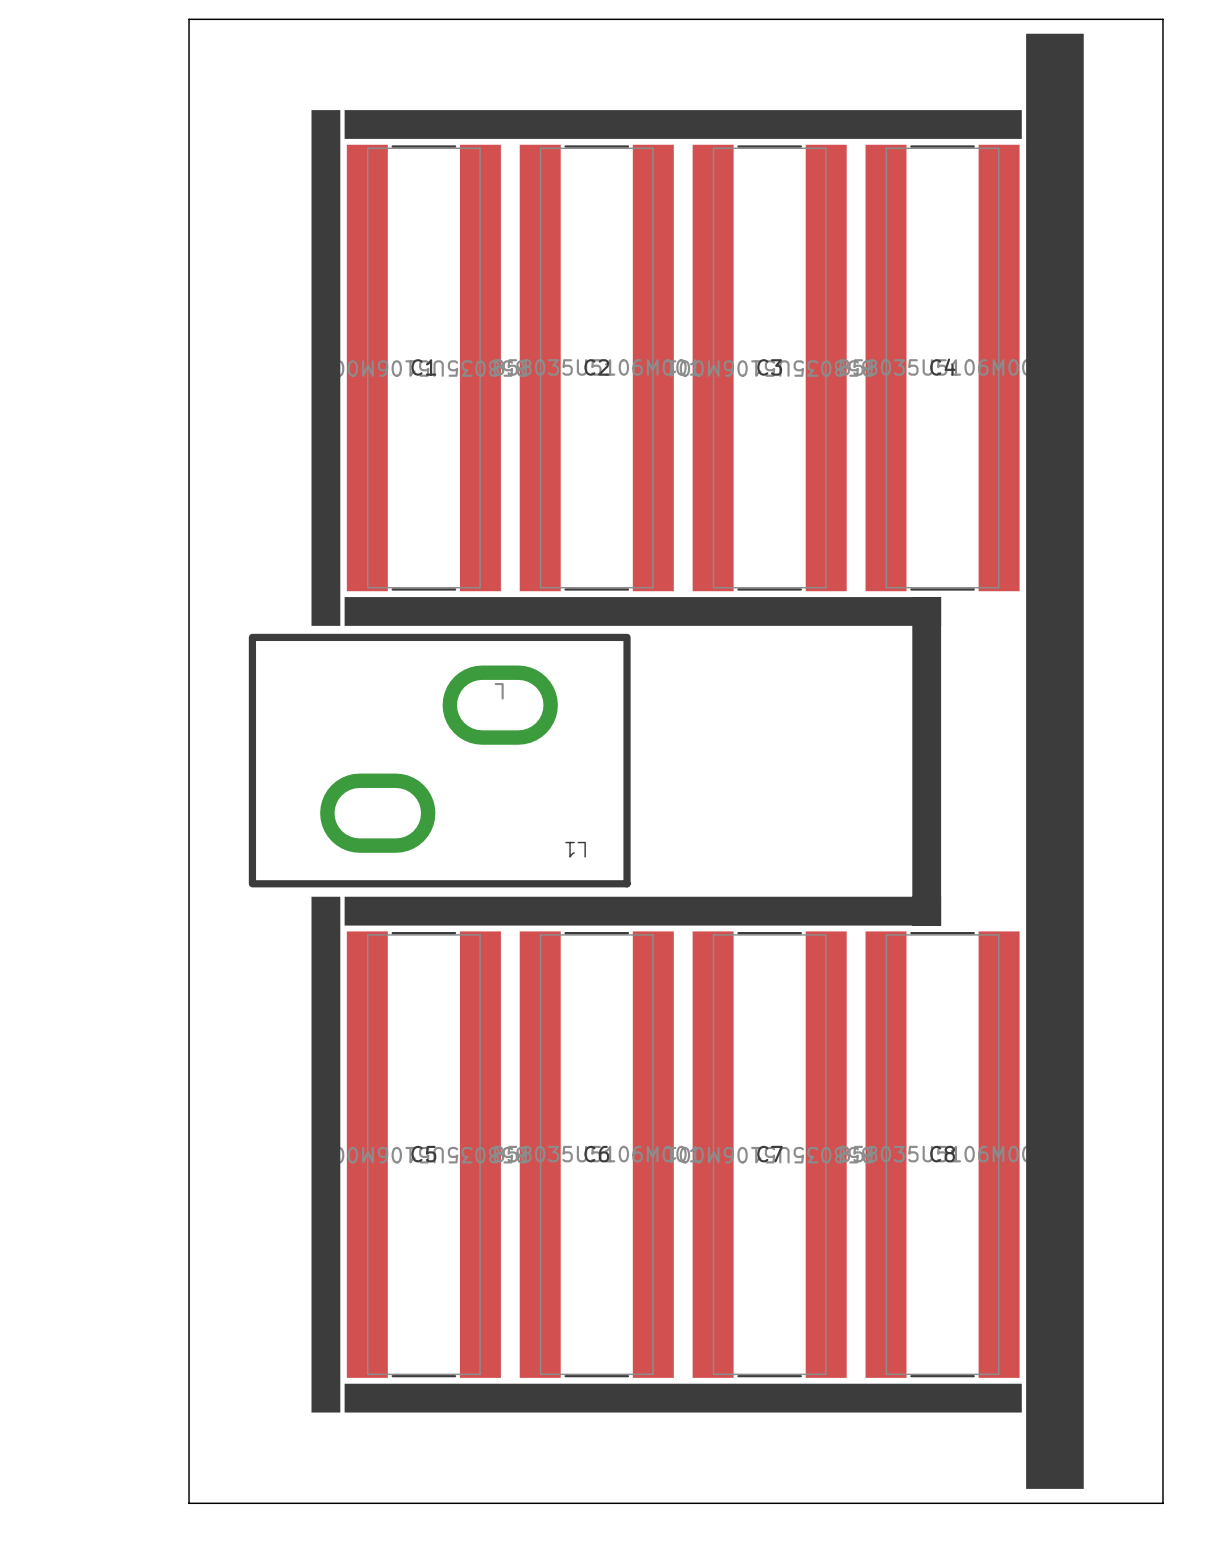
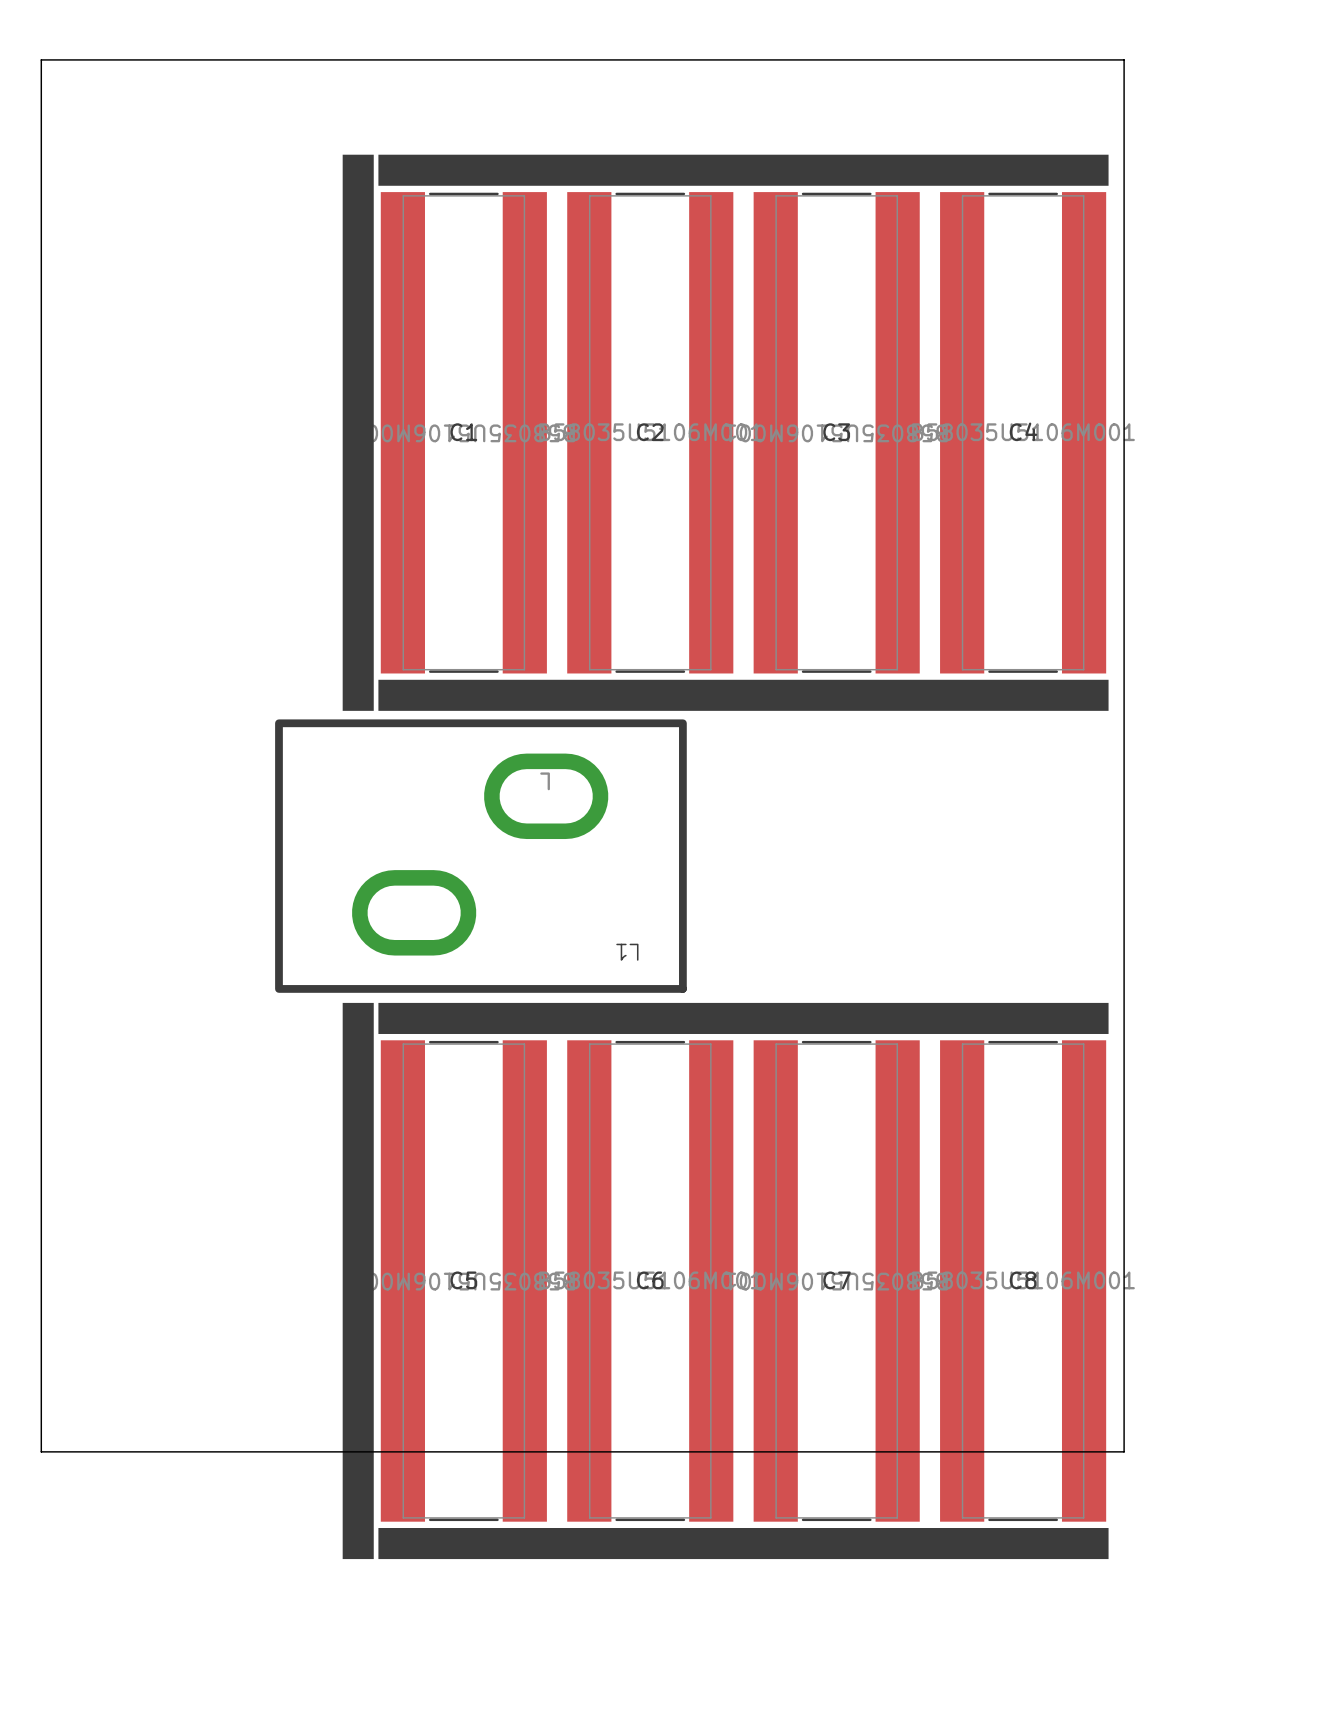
board edge: (189, 19) (1162, 19) (1162, 1503) (189, 1503) (189, 19) -> (41, 59) (41, 1451) (1124, 1451) (1124, 59) (41, 59)
drawing: [1026, 33, 1084, 1489] -> none
drawing: [344, 597, 942, 926] -> none
drawing: none -> [378, 679, 1109, 711]
drawing: none -> [378, 1002, 1109, 1034]

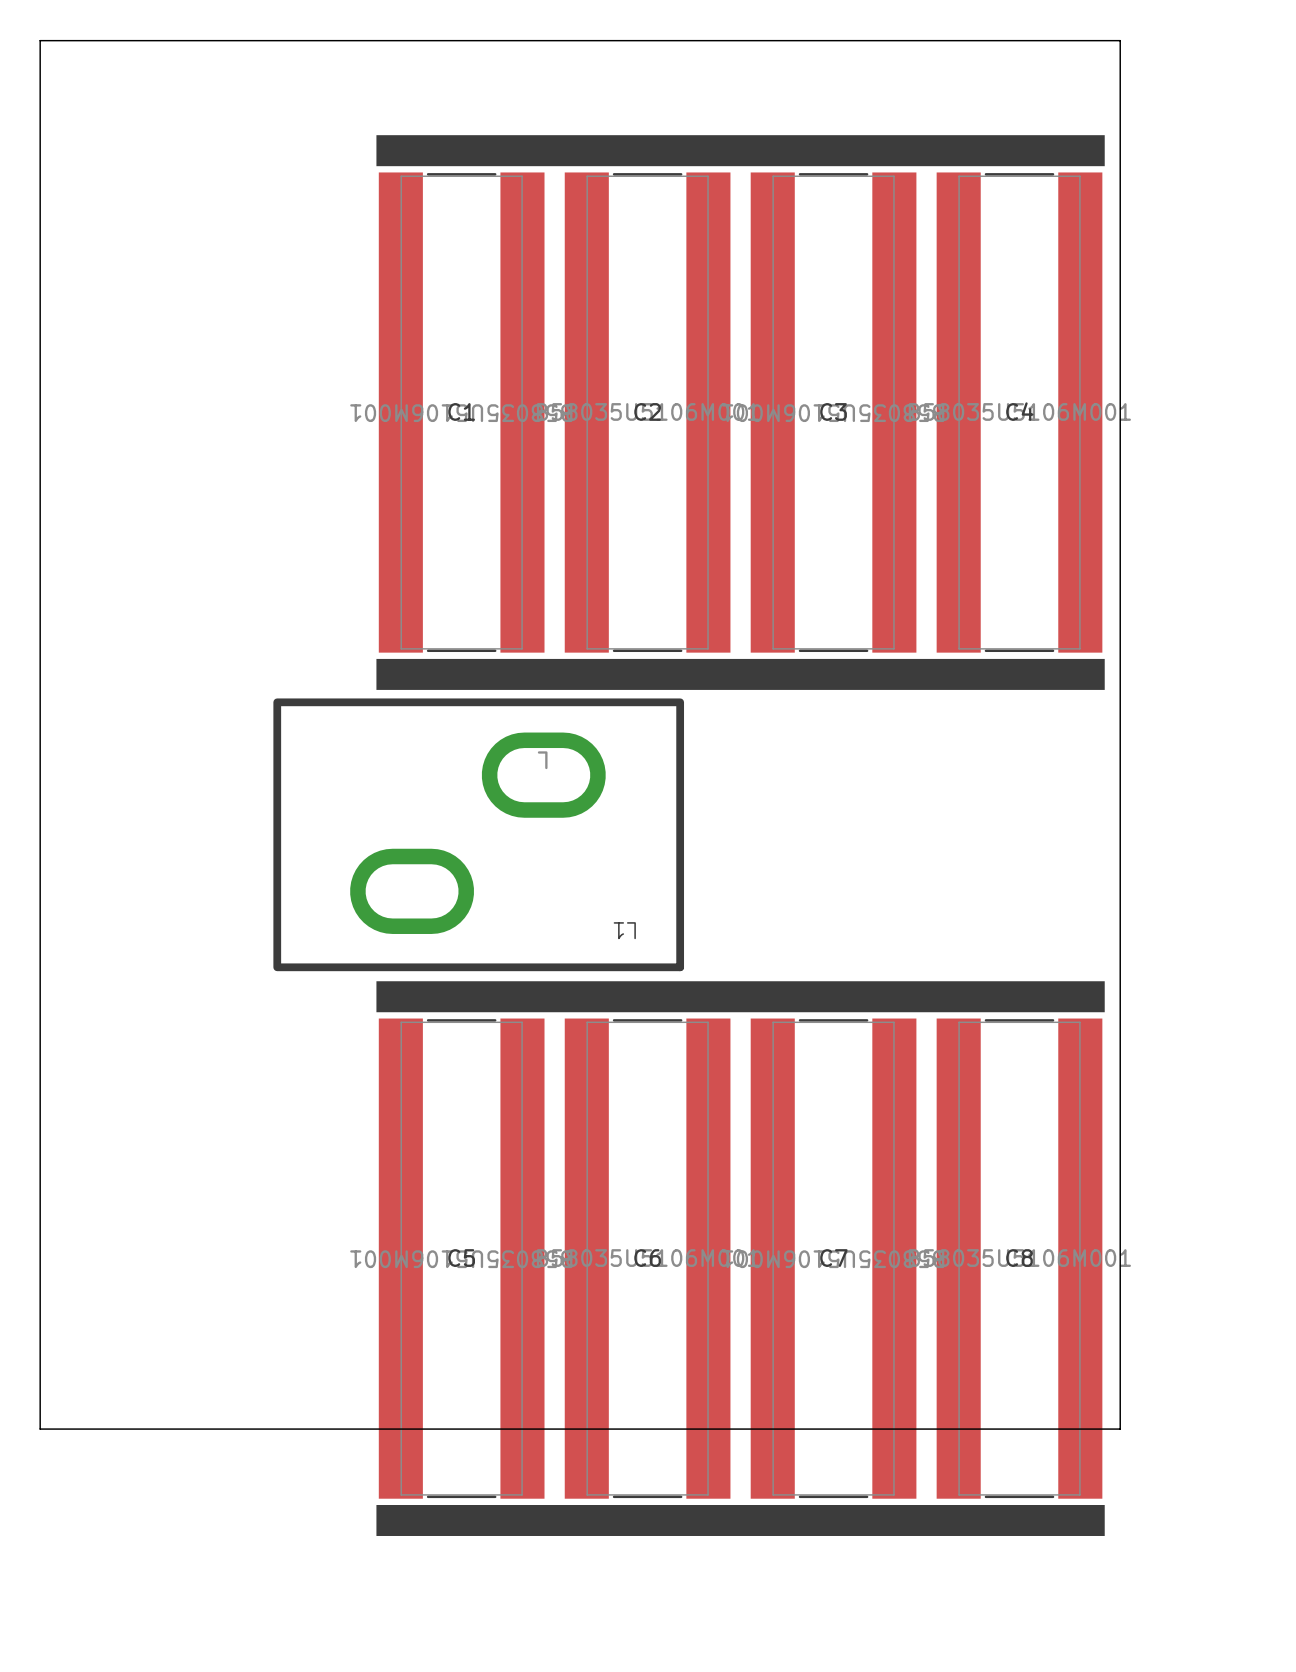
drawing: [342, 154, 374, 711] -> none
drawing: [342, 1002, 374, 1560] -> none

